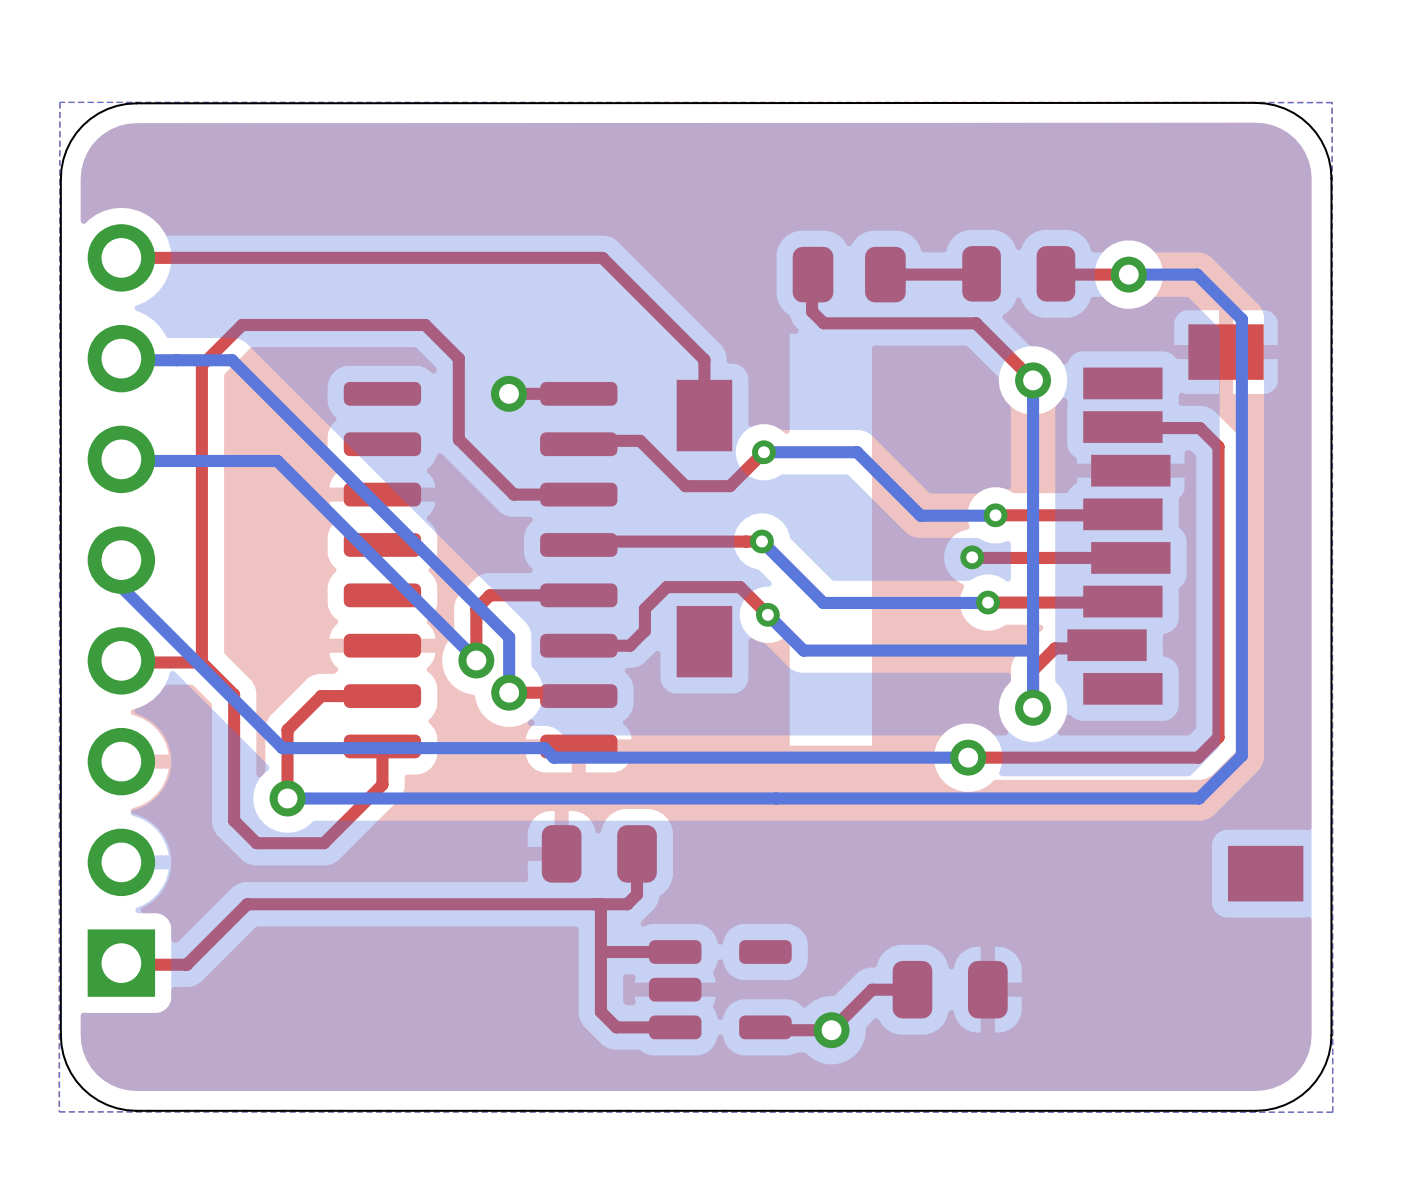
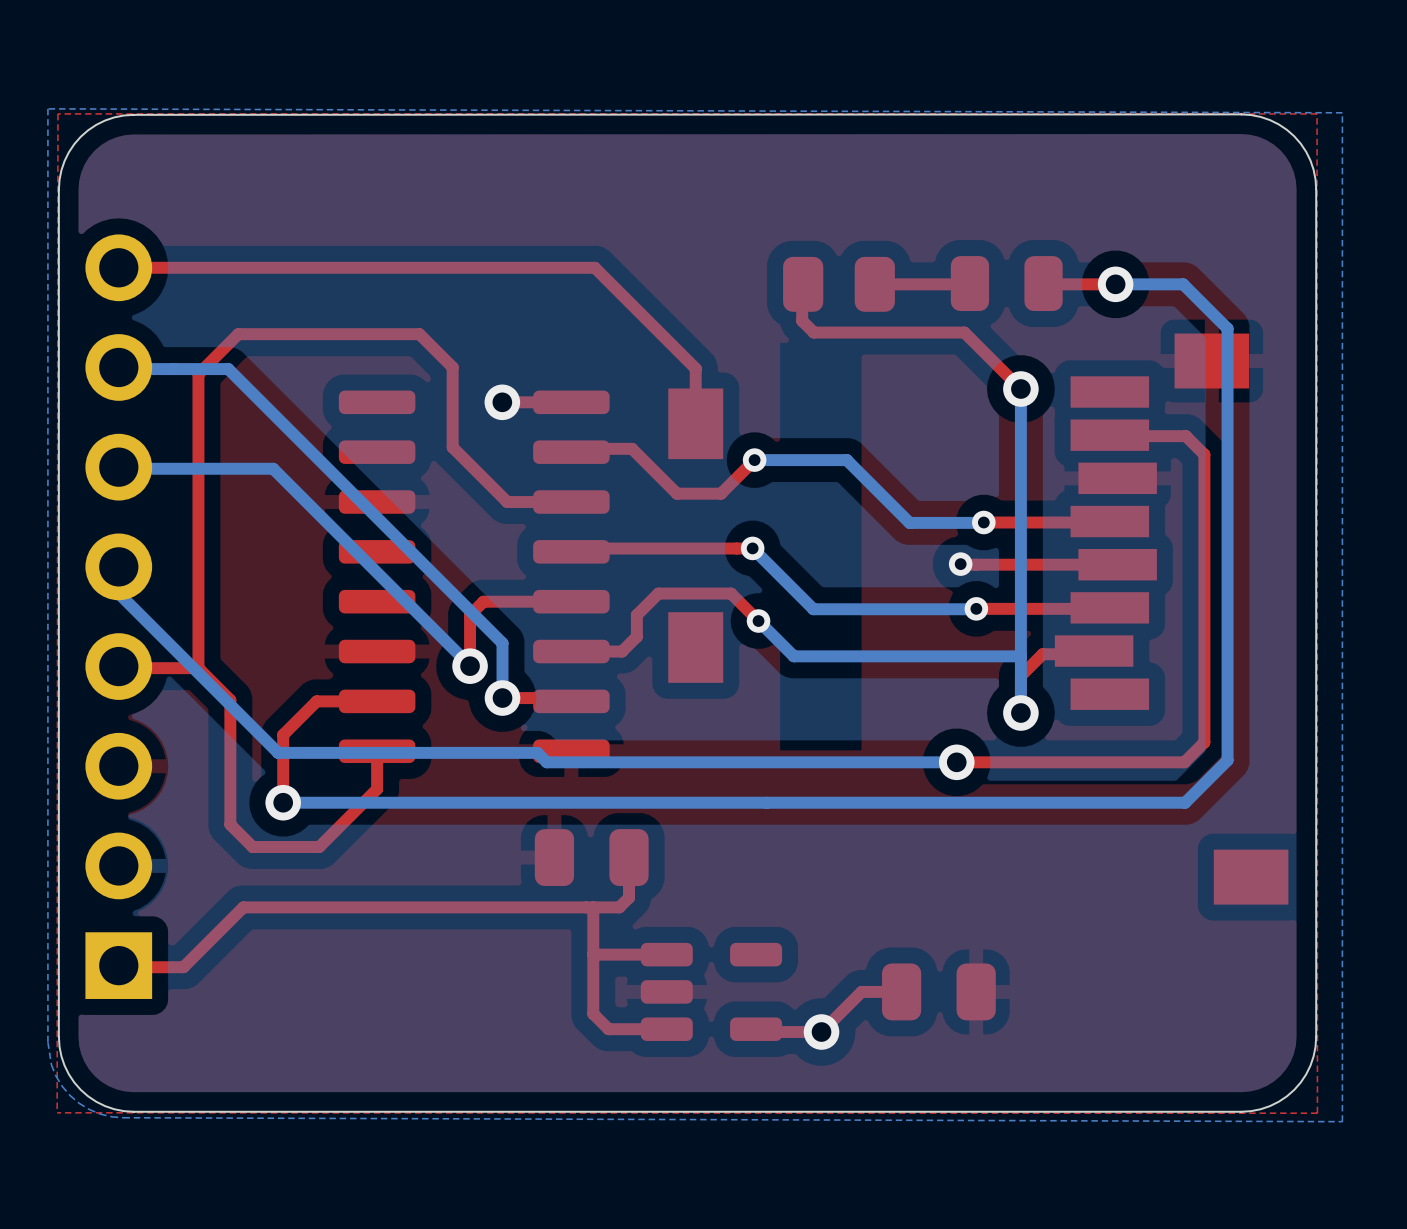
bottom zone outline: (59, 102) (1331, 102) (1332, 1112) (59, 1111) (59, 102) -> (47, 108) (1342, 112) (1342, 1121) (123, 1117) (100, 1114) (79, 1103) (70, 1095) (56, 1076) (51, 1065) (47, 1042) (47, 108)

